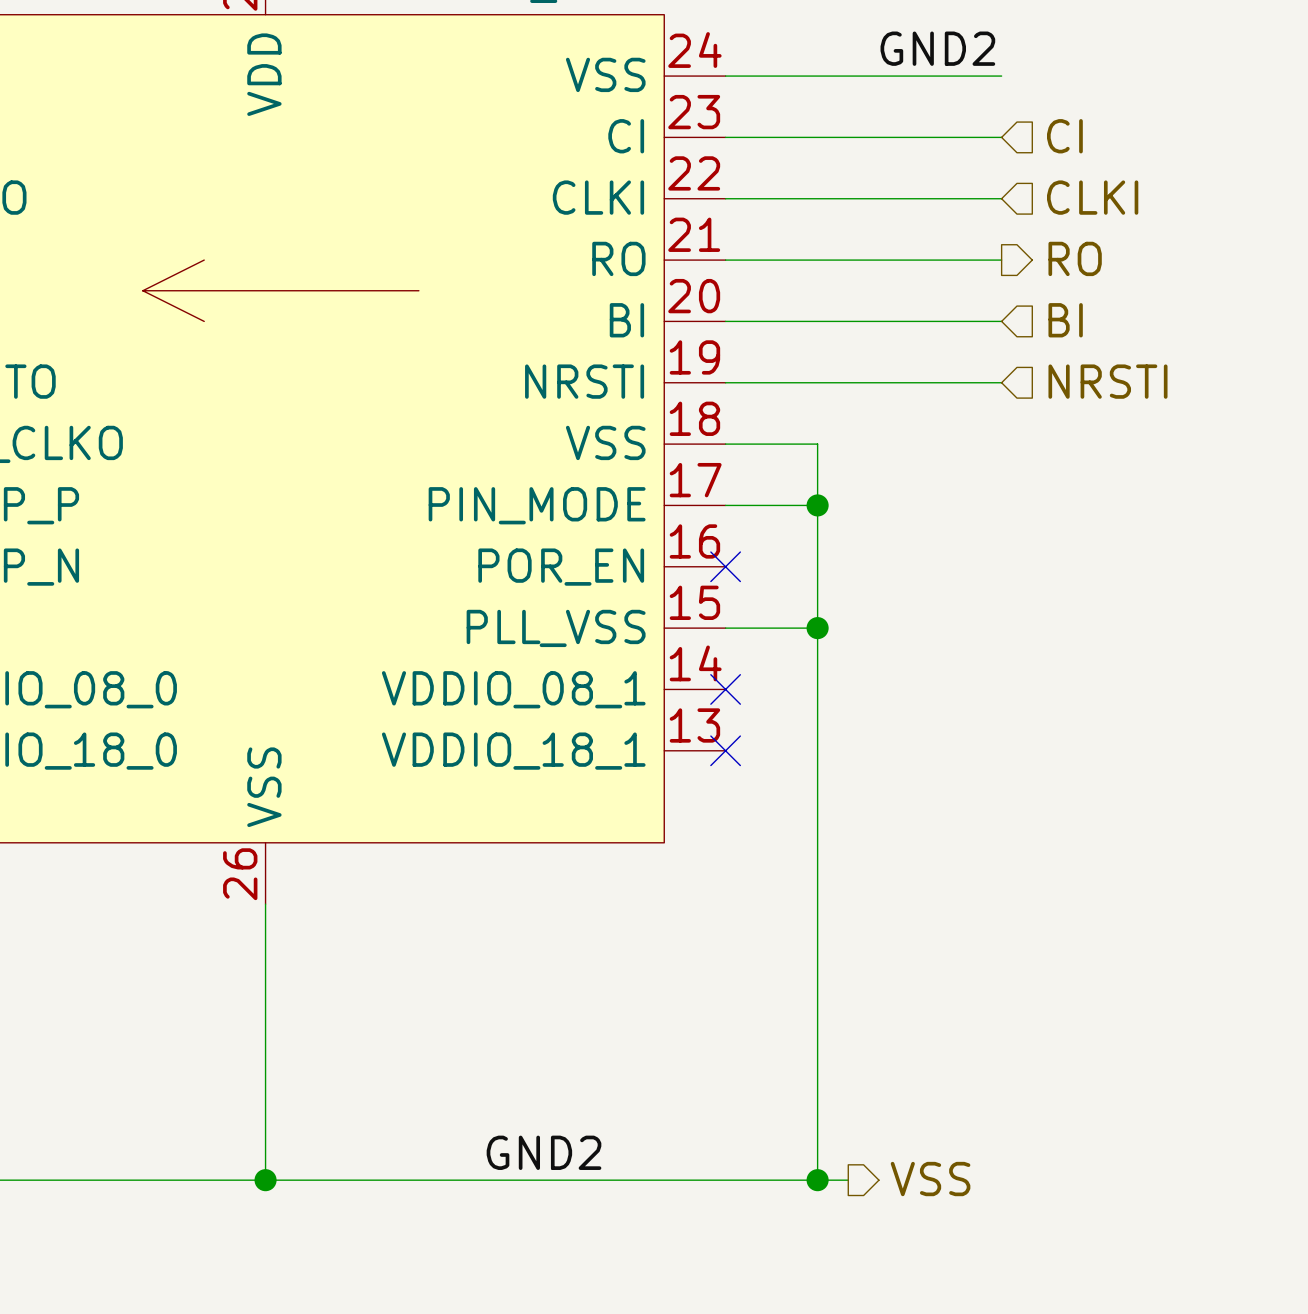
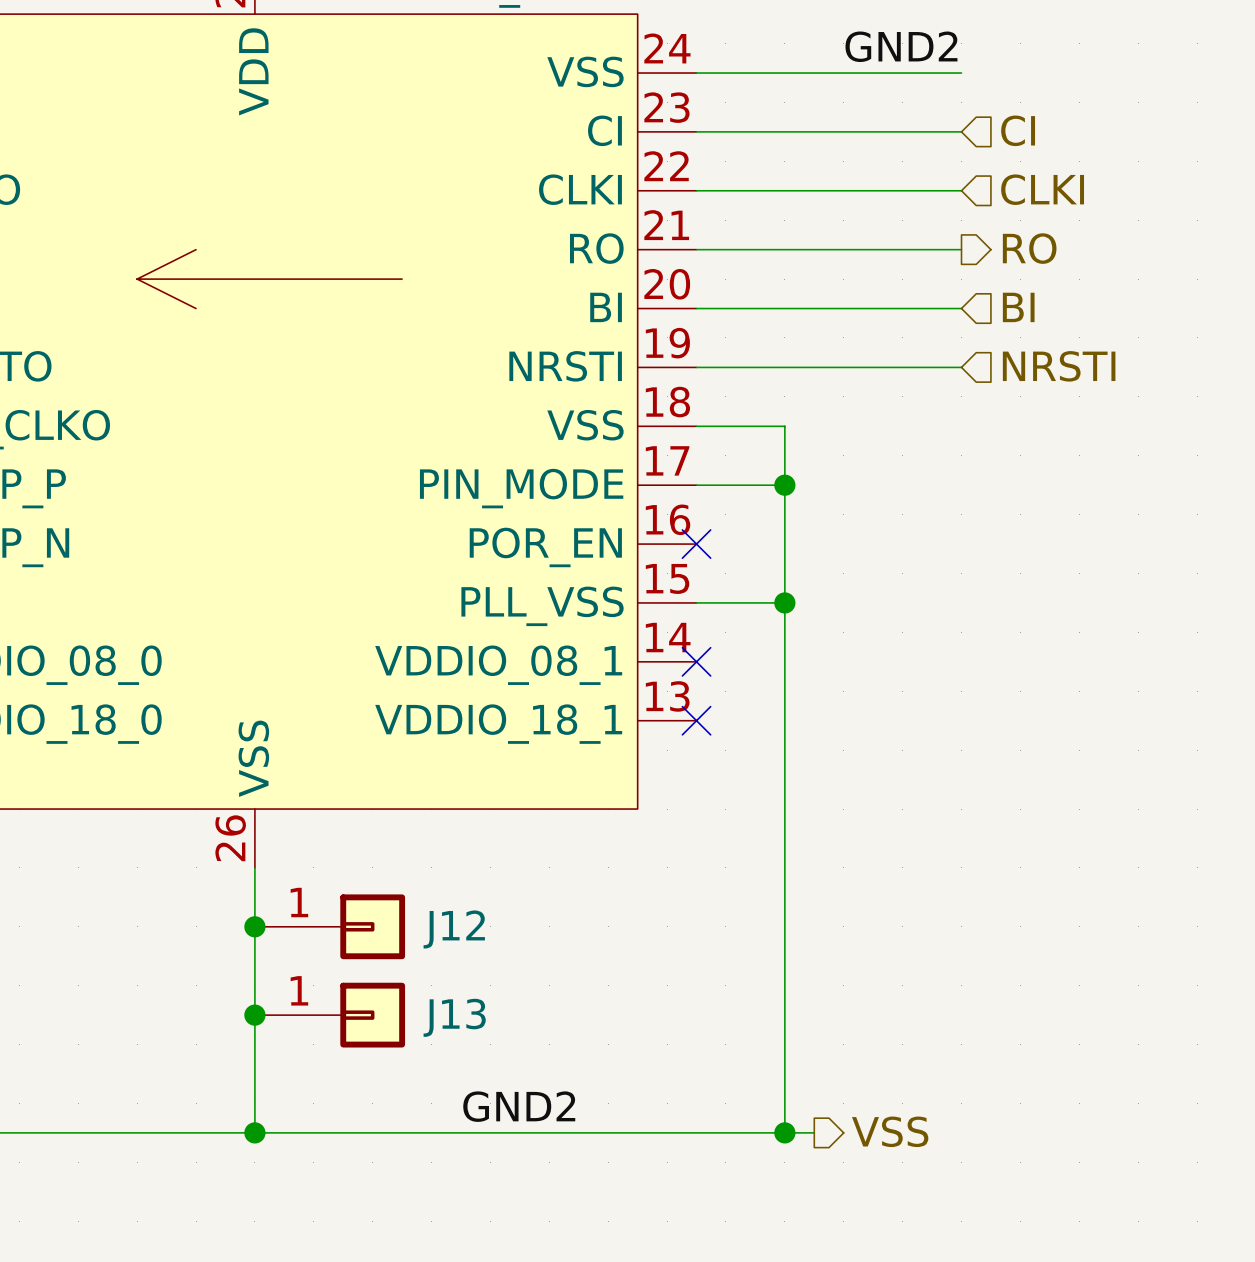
junction: none -> (254, 926)
J12: none -> (329, 926)
junction: none -> (254, 1015)
J13: none -> (329, 1015)

